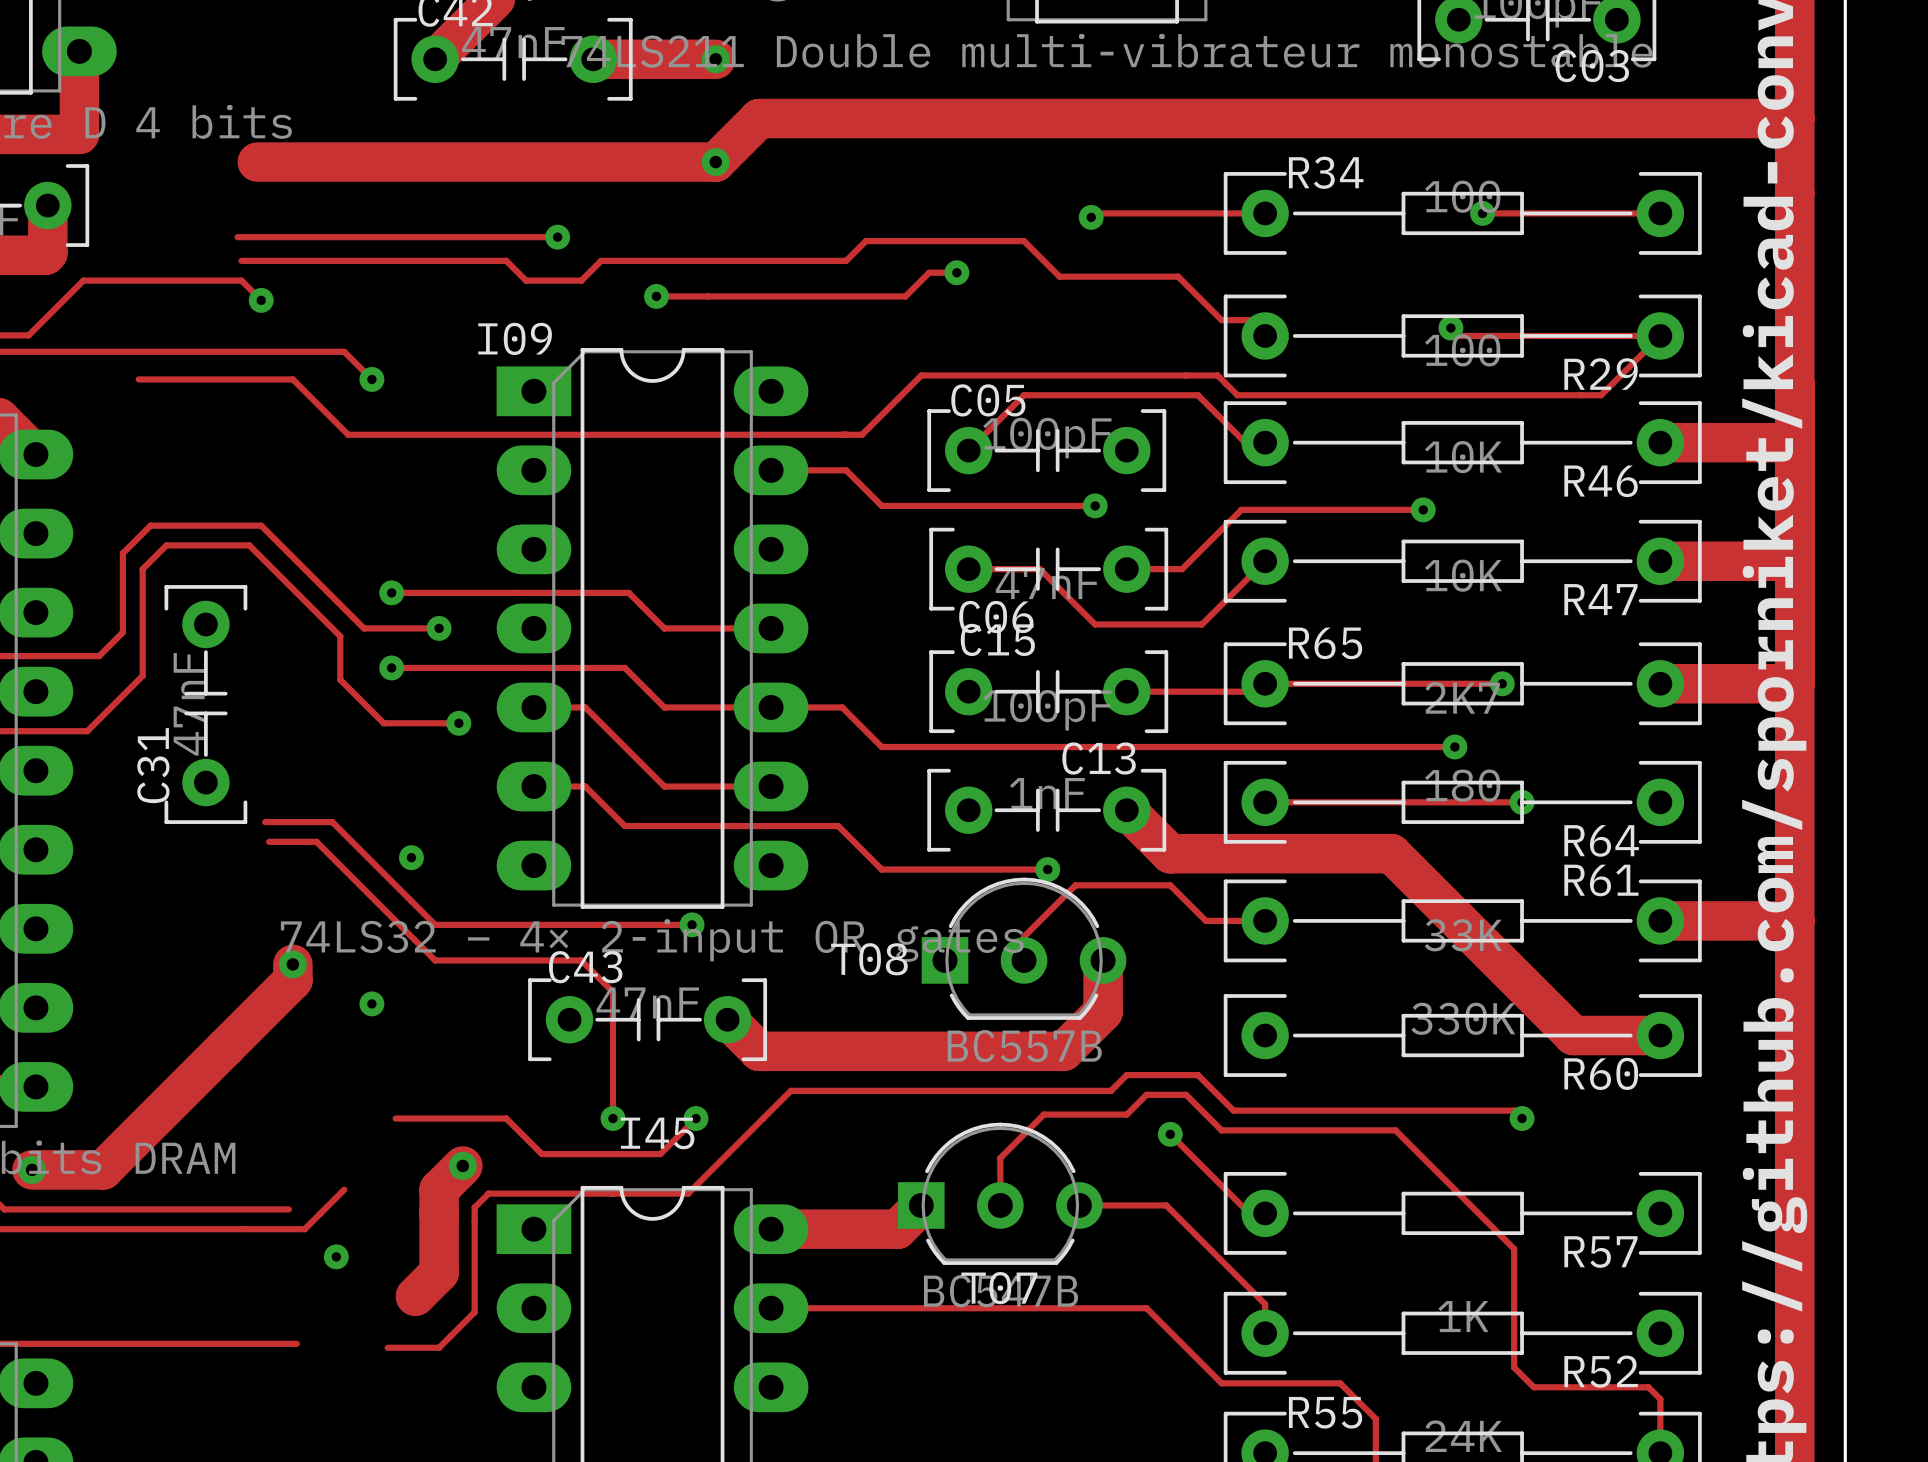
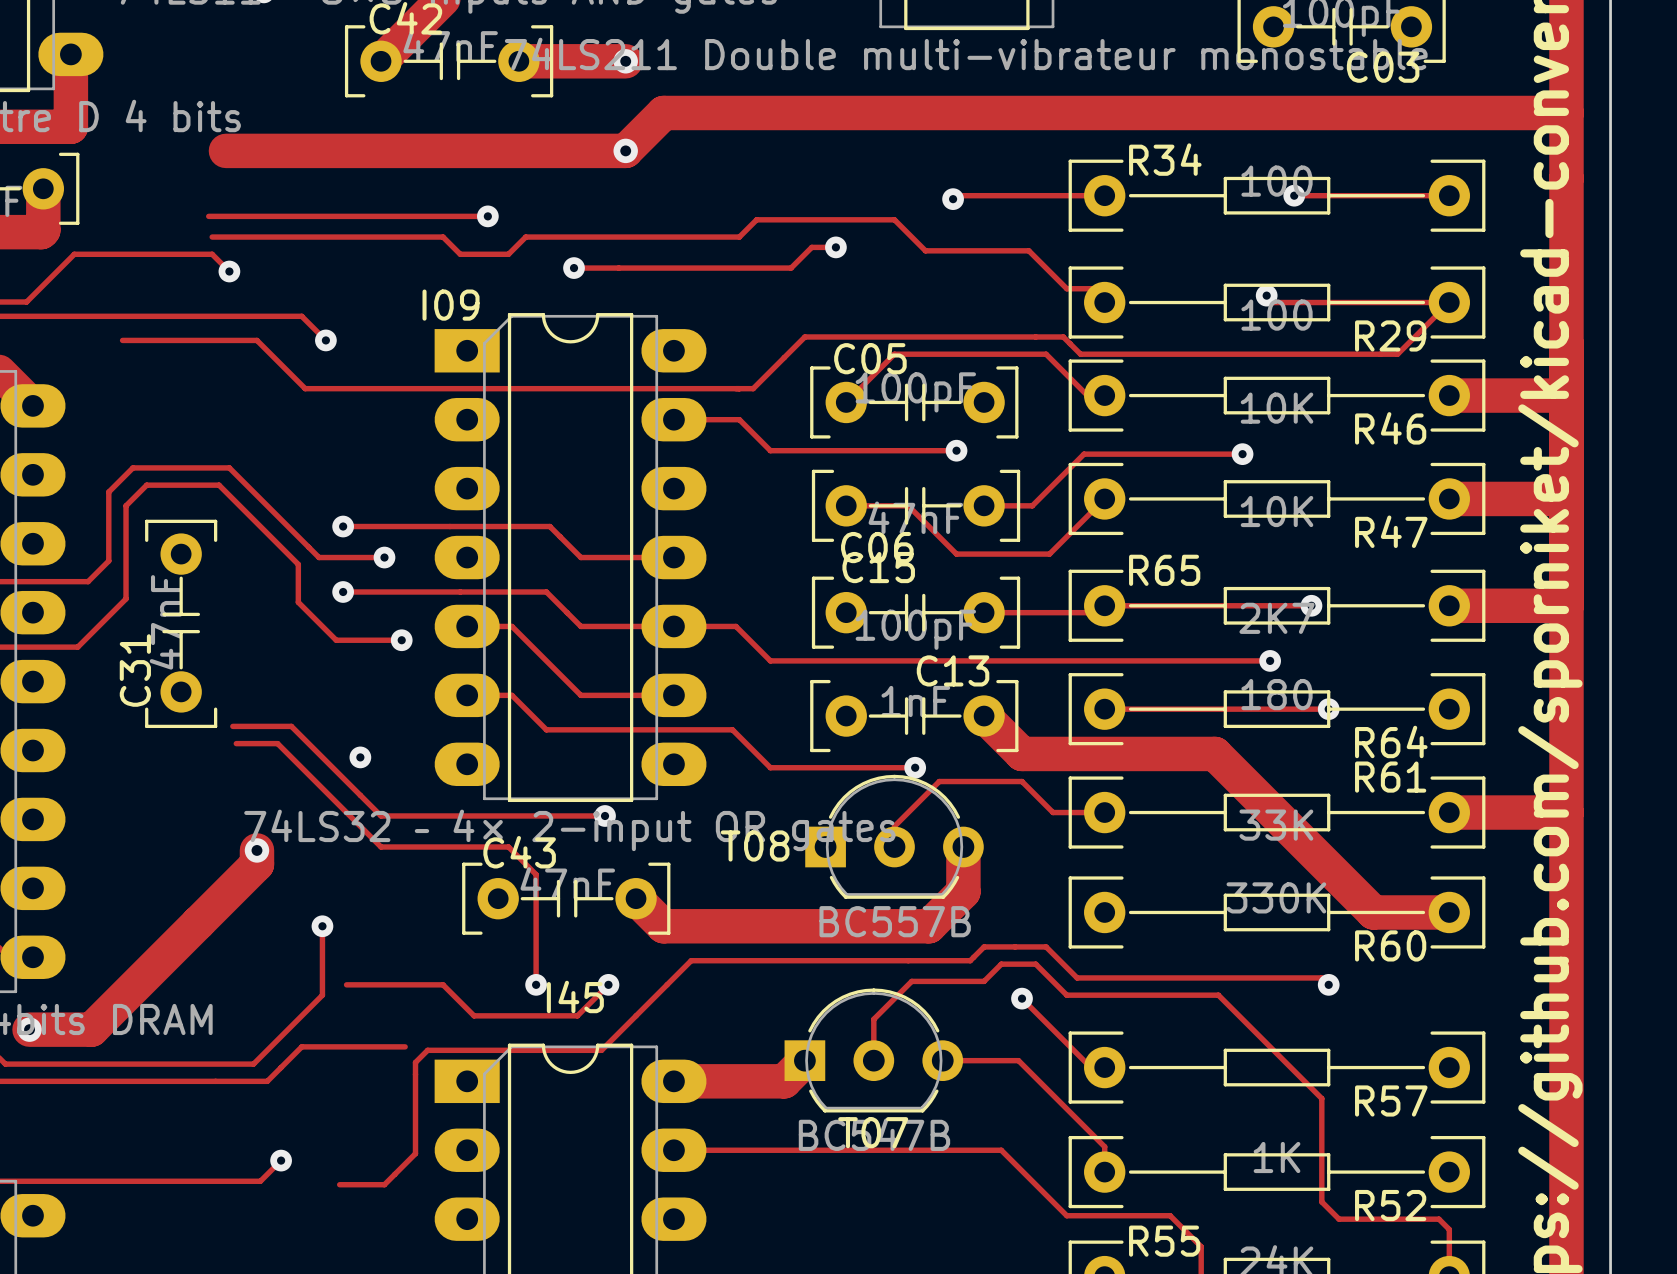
via position: (371, 1003) -> (322, 926)
track: none -> (322, 926) (322, 995) (253, 1064)
track: (462, 1165) (439, 1189) (439, 1272) (415, 1296) -> none
via: (462, 1165) -> none
track: none -> (301, 1046) (405, 1046)
via position: (336, 1256) -> (281, 1160)
track: none -> (281, 1160) (260, 1181)

